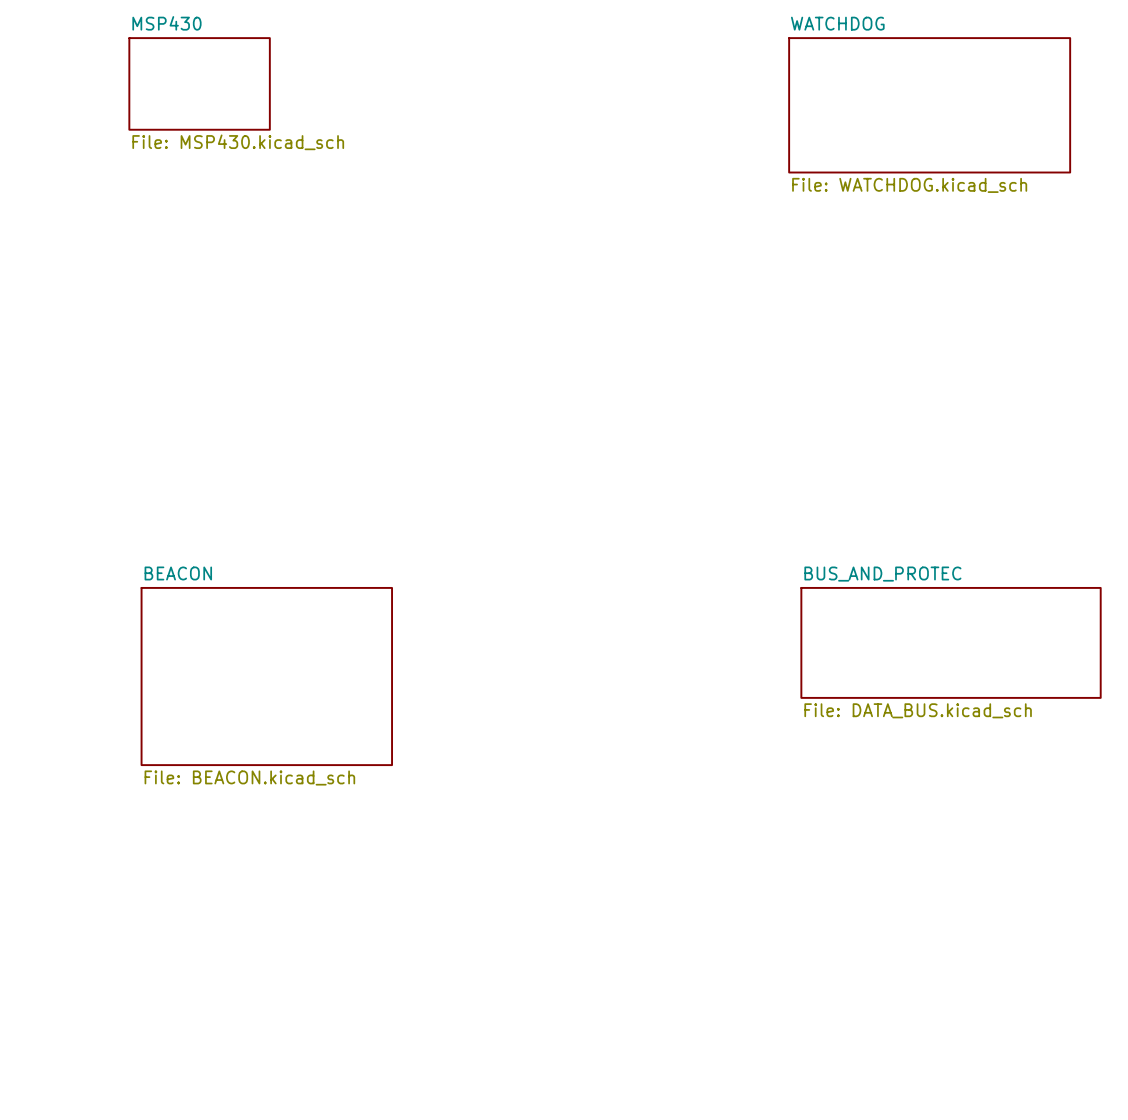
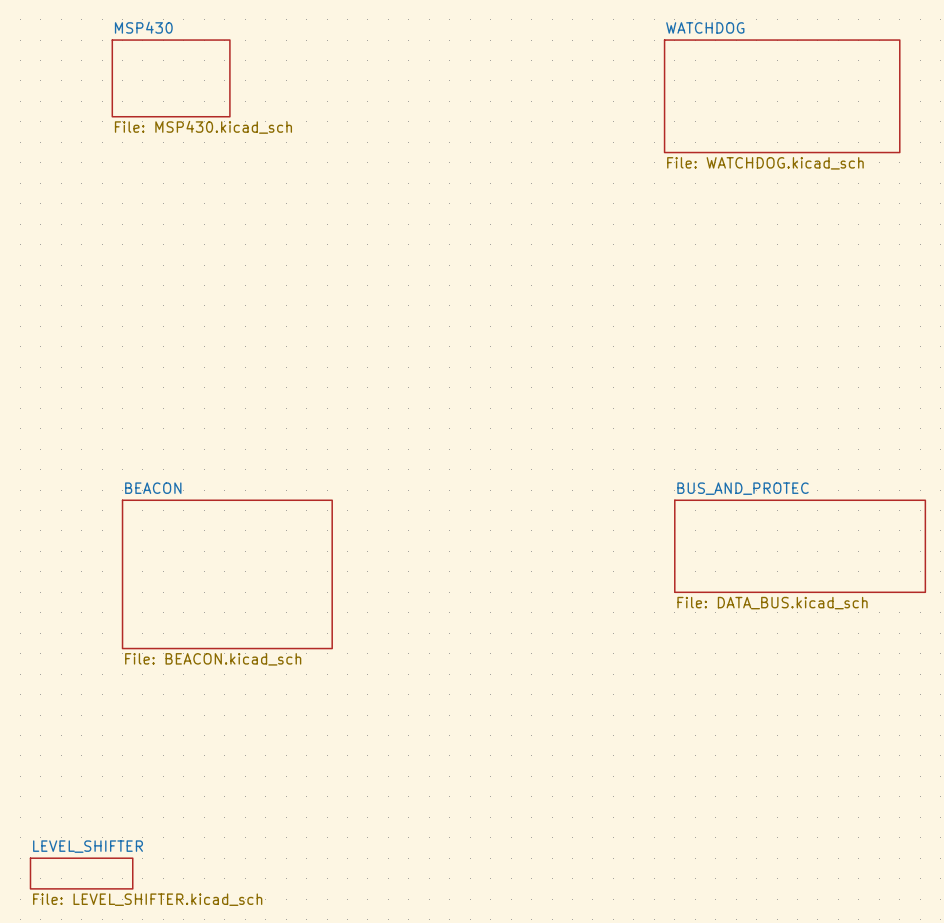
sheet LEVEL_SHIFTER: none -> File: LEVEL_SHIFTER.kicad_sch (81, 873)

